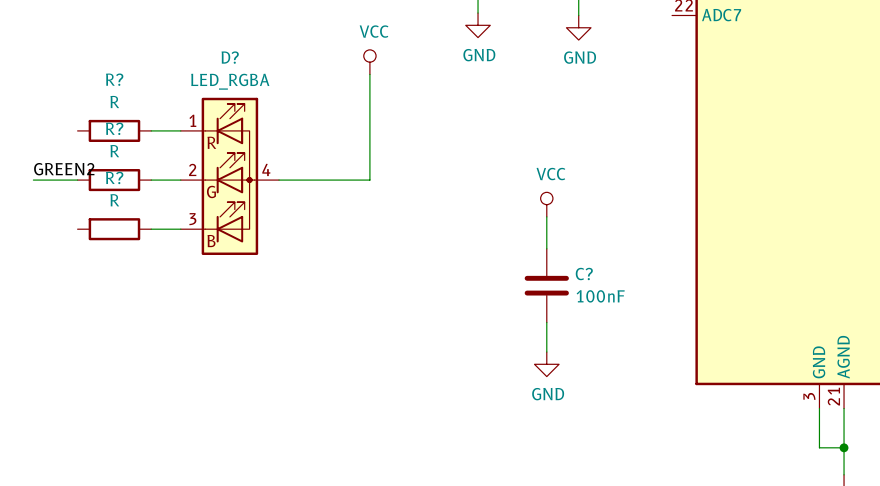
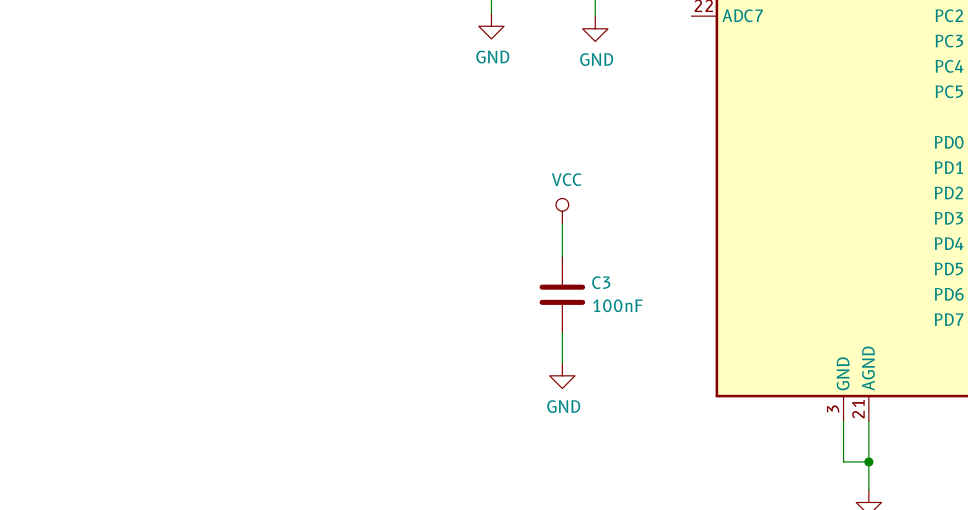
power symbol: VCC (369, 62) -> none
wire: (369, 74) (369, 180) (279, 180) -> none
R?: R (114, 130) -> none
wire: (151, 130) (180, 130) -> none
label: GREEN2 (64, 169) -> none
D?: LED_RGBA (229, 176) -> none
wire: (33, 180) (77, 180) -> none
R?: R (114, 180) -> none
wire: (151, 180) (180, 180) -> none
R?: R (114, 229) -> none
wire: (151, 229) (180, 229) -> none
C? name: C? (584, 274) -> C3 (601, 282)

